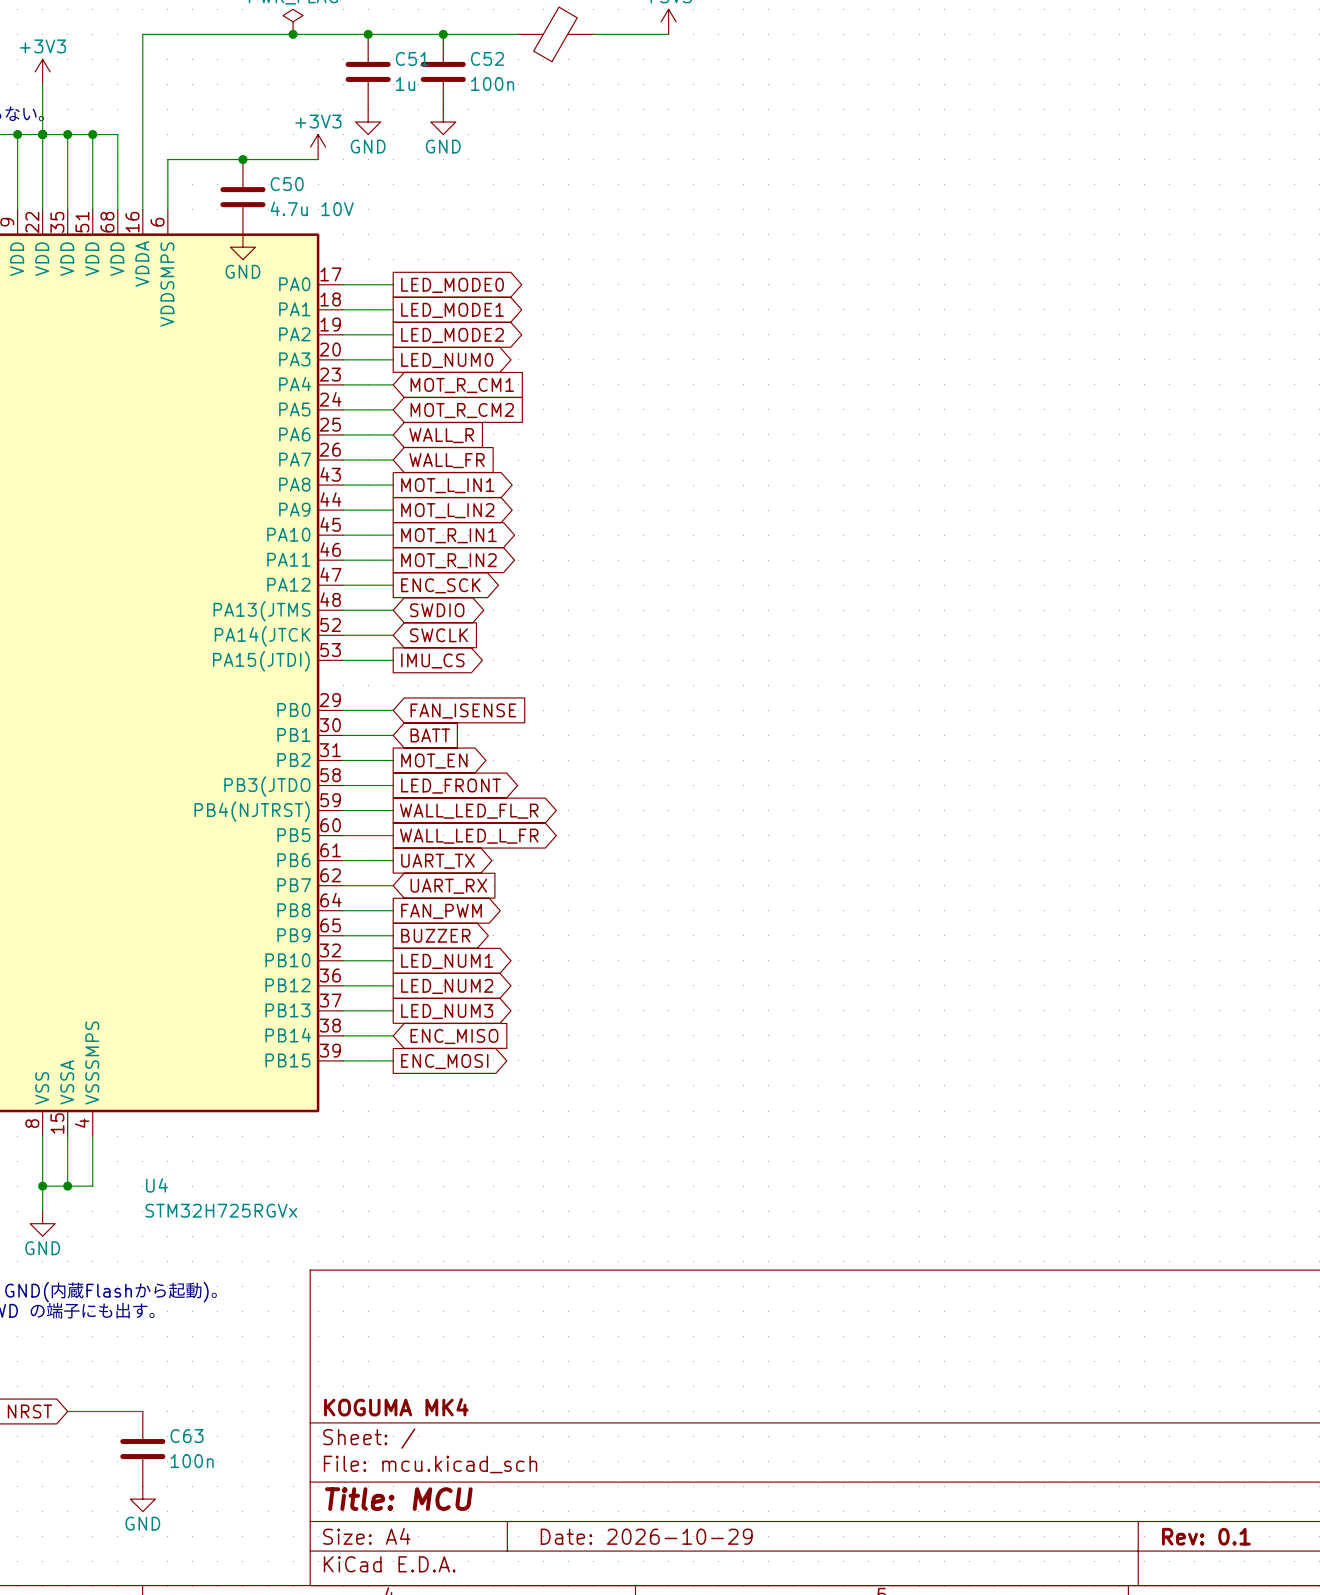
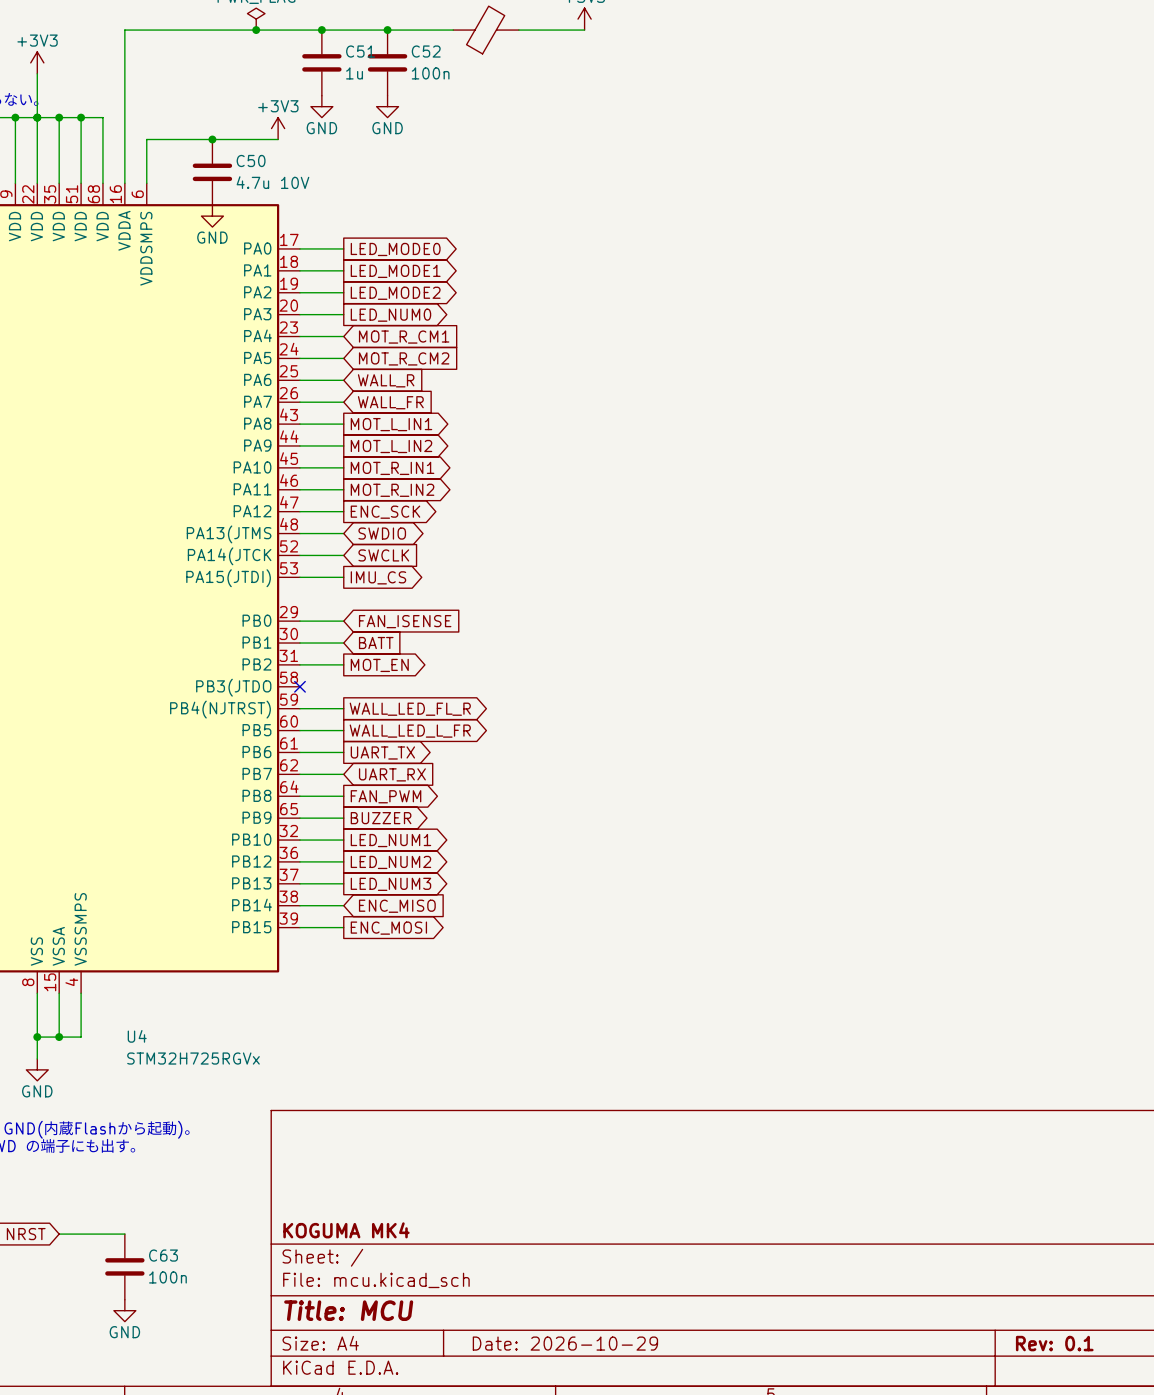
wire: (343, 785) (393, 785) -> none
no-connect mark: none -> (299, 686)
global label: LED_FRONT (451, 786) -> none

